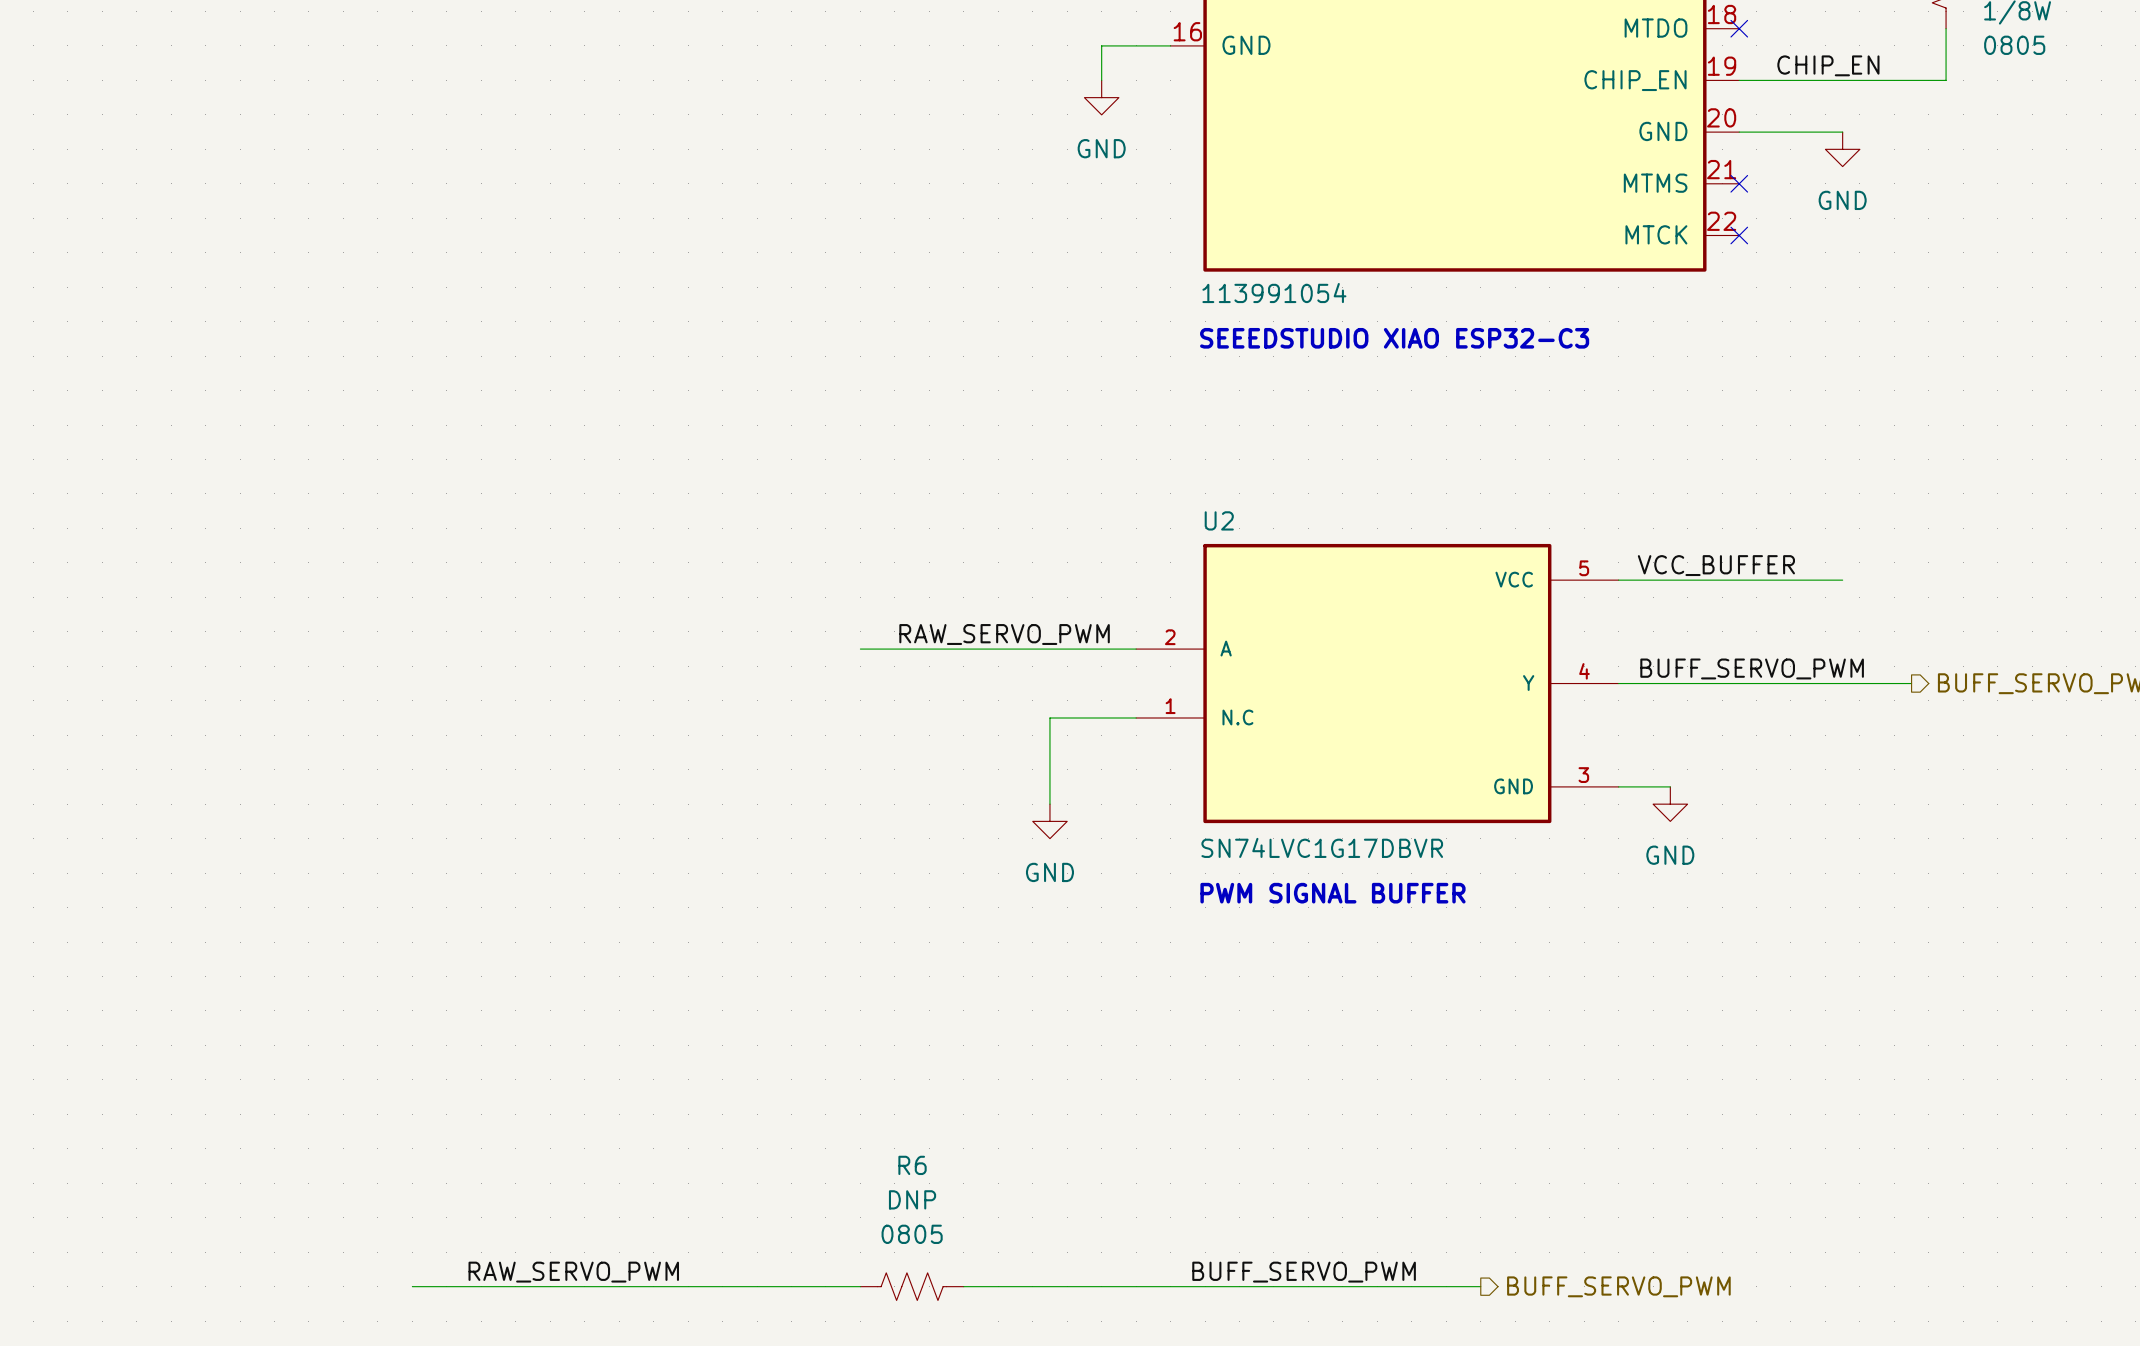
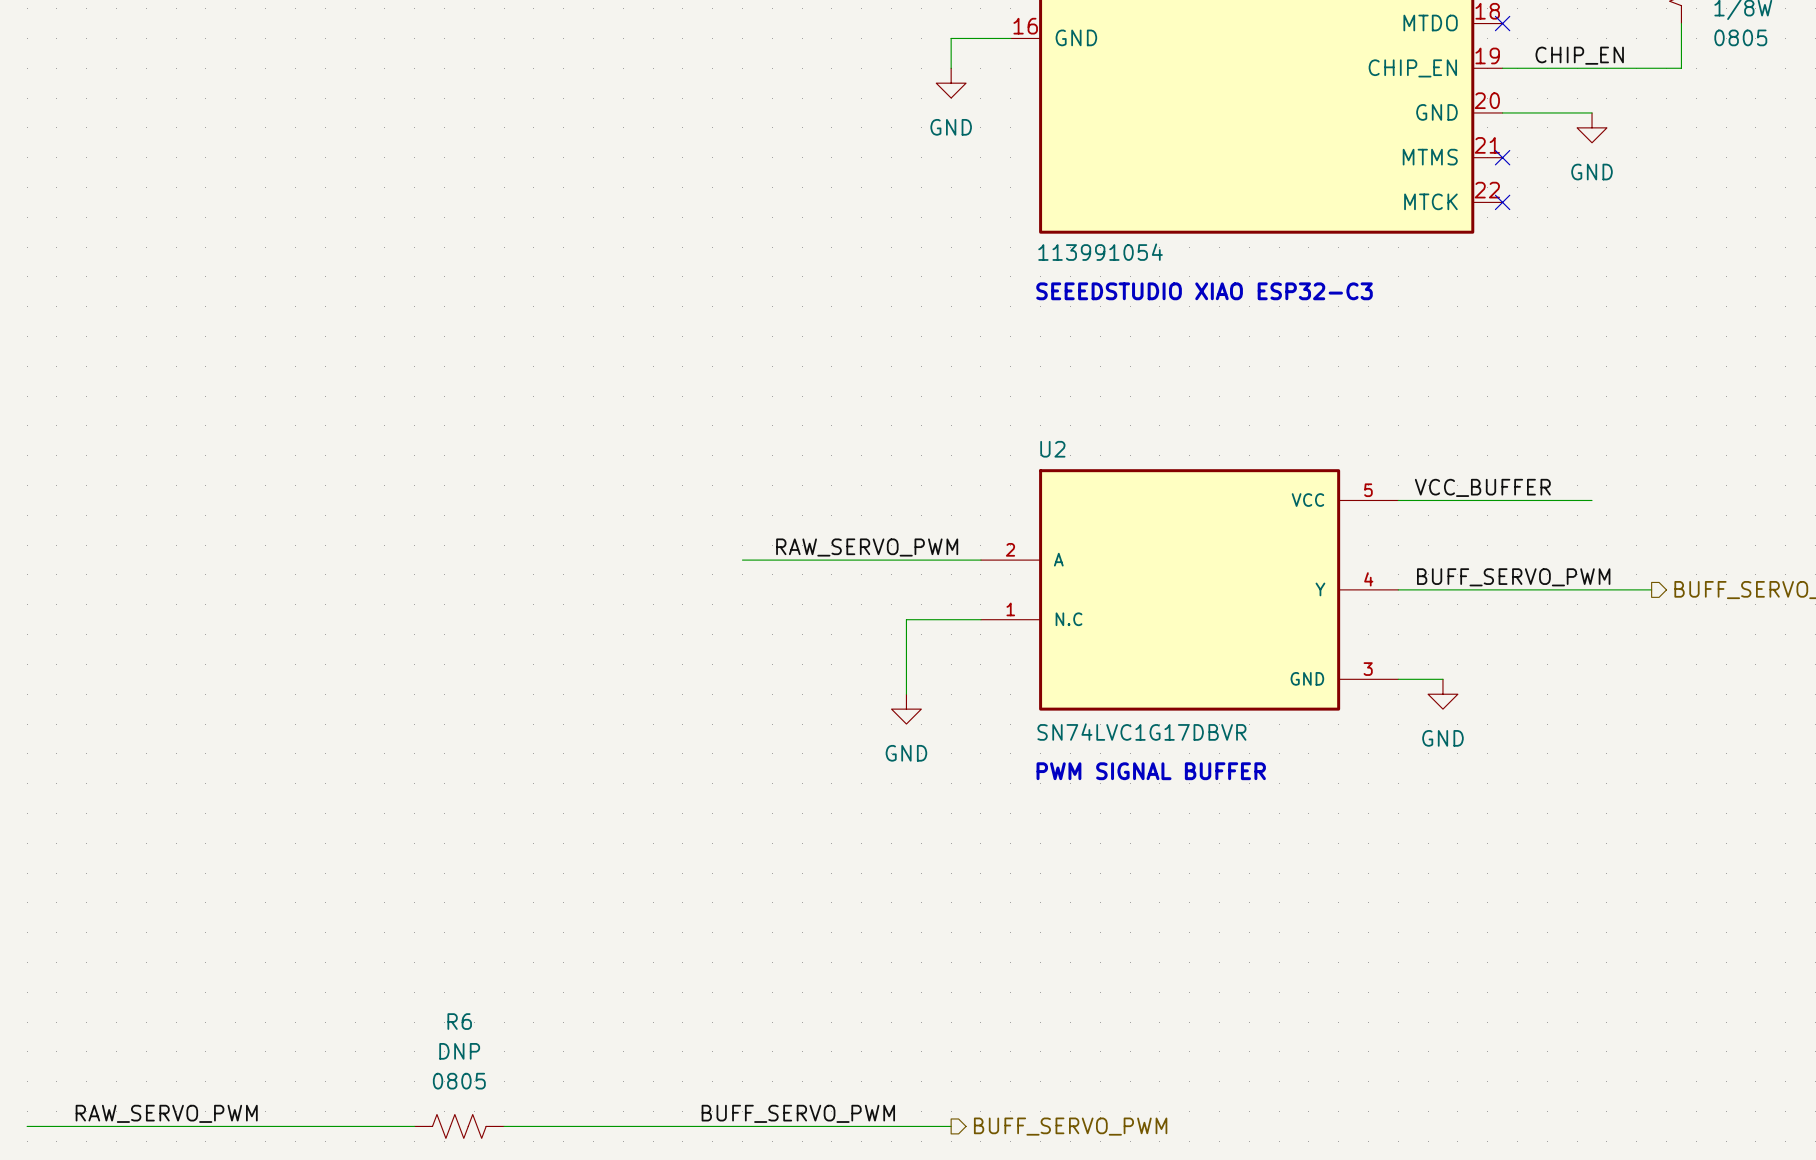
label: RAW_SERVO_PWM (573, 1272) -> none
label: BUFF_SERVO_PWM (1304, 1272) -> none
wire: (412, 1286) (860, 1286) -> none
R6 position: (912, 1286) -> (459, 1126)
wire: (963, 1286) (1480, 1286) -> none
hierarchical label: BUFF_SERVO_PWM (1618, 1286) -> none
label: none -> RAW_SERVO_PWM (166, 1113)
label: none -> BUFF_SERVO_PWM (798, 1113)
wire: none -> (27, 1126) (414, 1126)
wire: none -> (504, 1126) (951, 1126)
hierarchical label: none -> BUFF_SERVO_PWM (1070, 1126)

